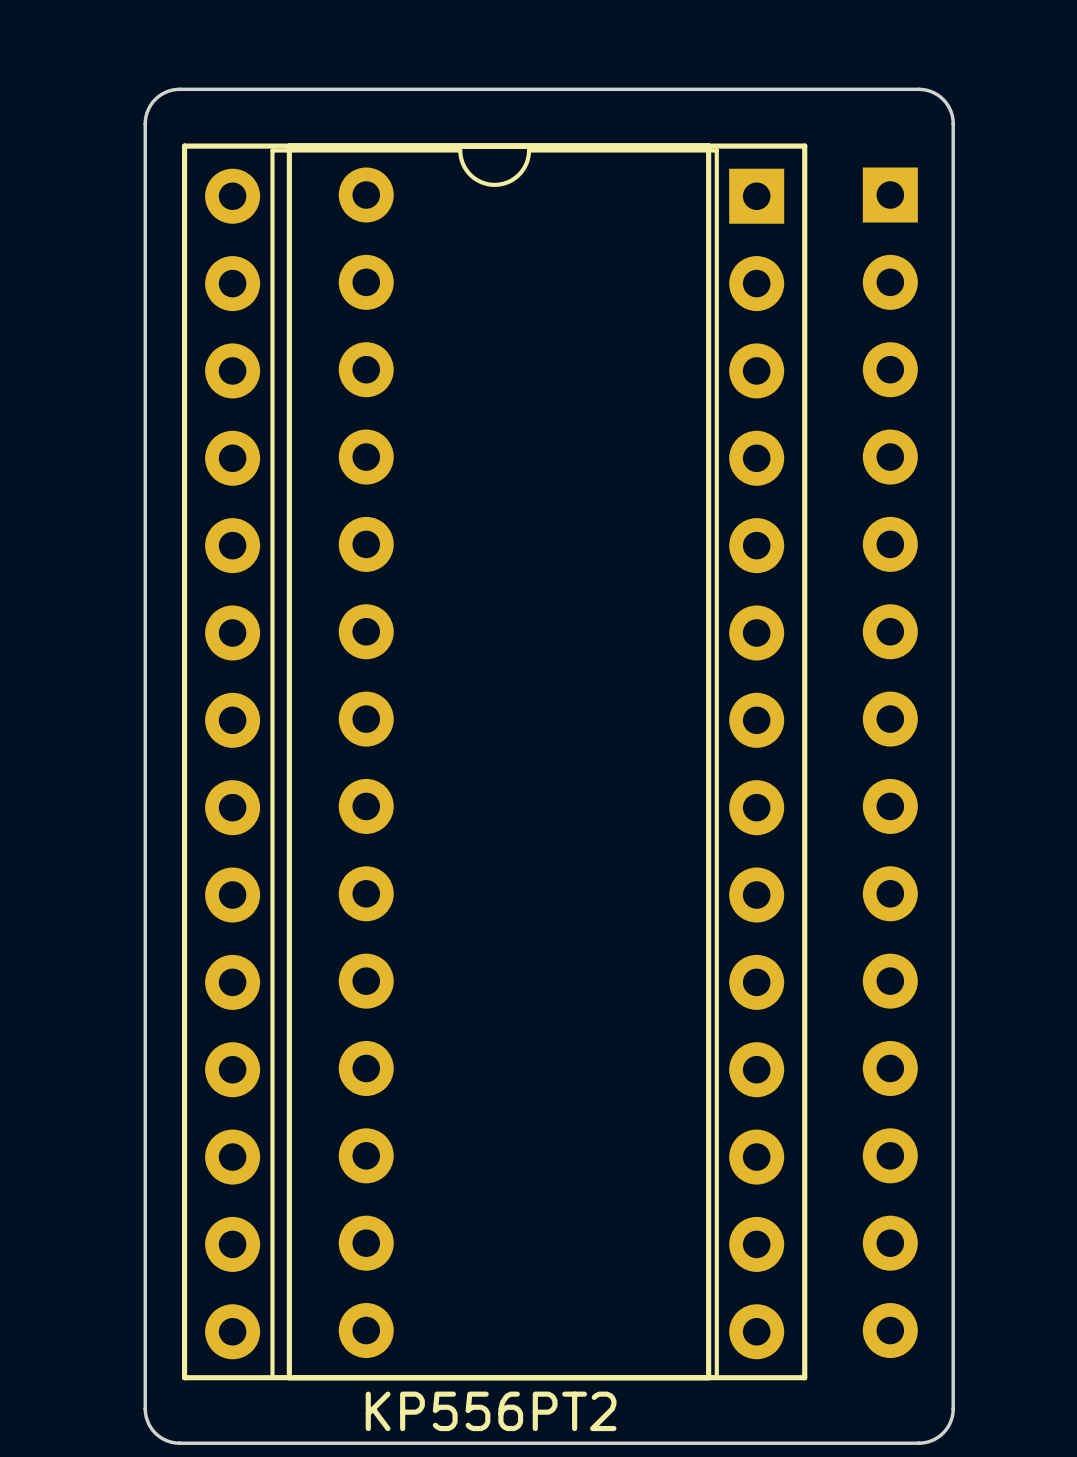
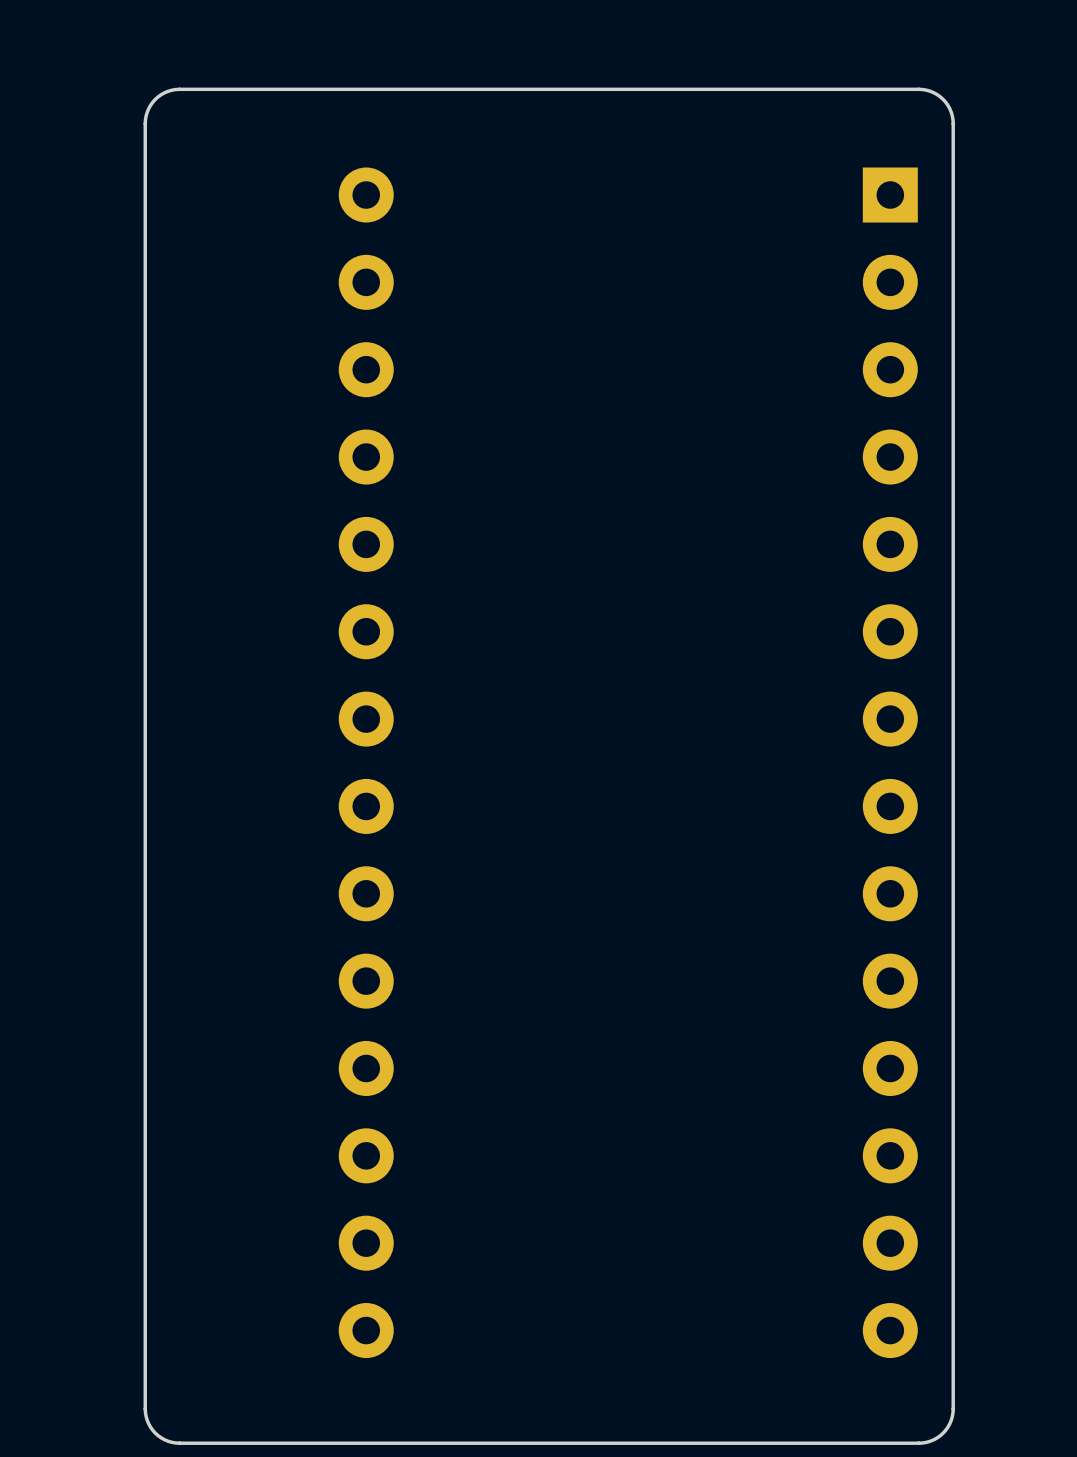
line: (289, 146) (289, 1377) -> none
line: (708, 146) (708, 1377) -> none
line: (804, 146) (184, 146) (184, 1377) (804, 1377) (804, 146) -> none
part: КР556РТ2 (494, 764) -> none

